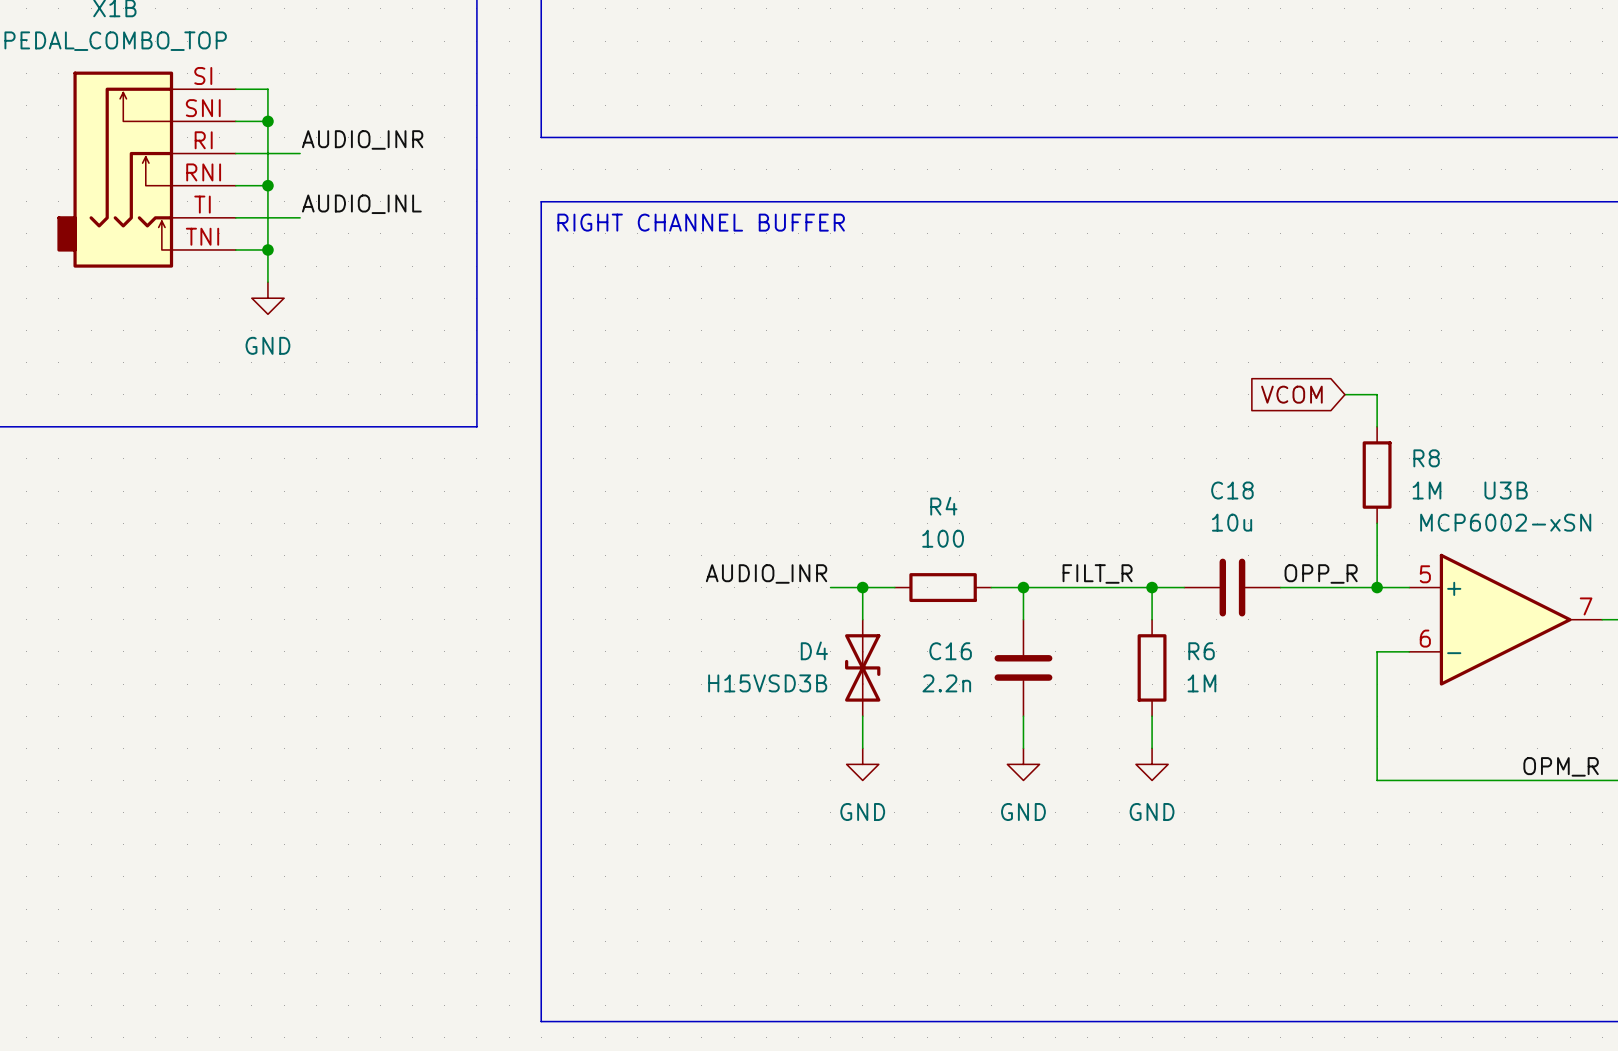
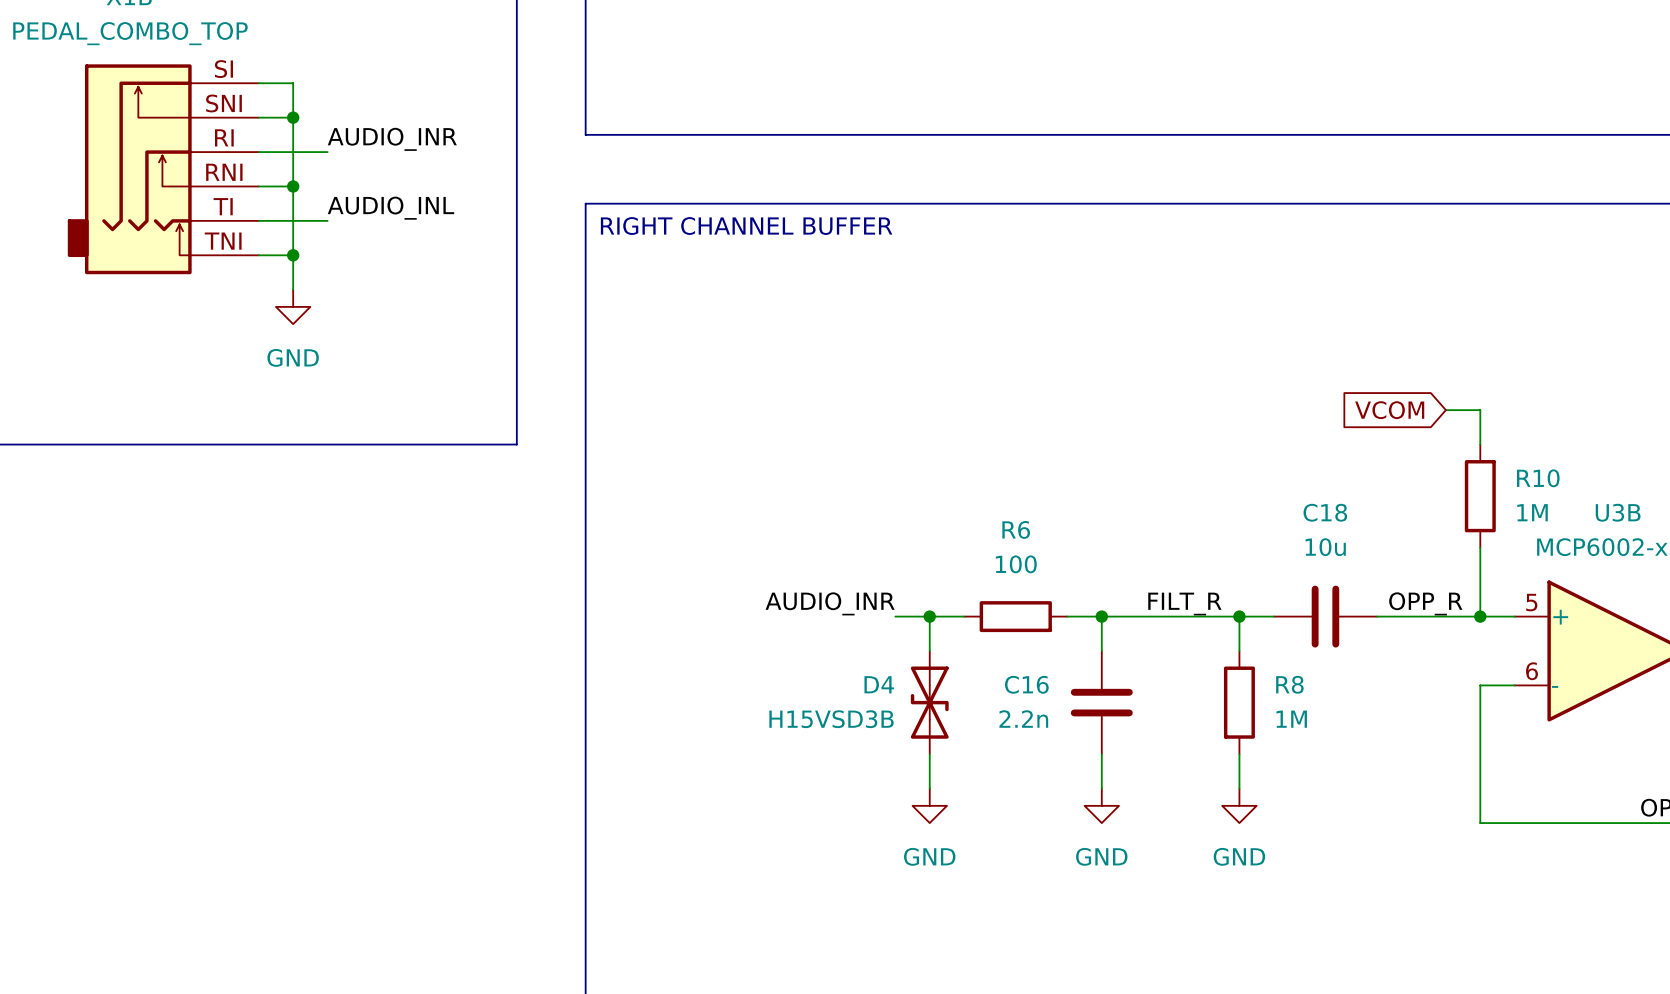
R8 name: R8 (1426, 458) -> R10 (1538, 478)
R4 name: R4 (943, 506) -> R6 (1016, 529)
R6 name: R6 (1201, 651) -> R8 (1289, 684)

